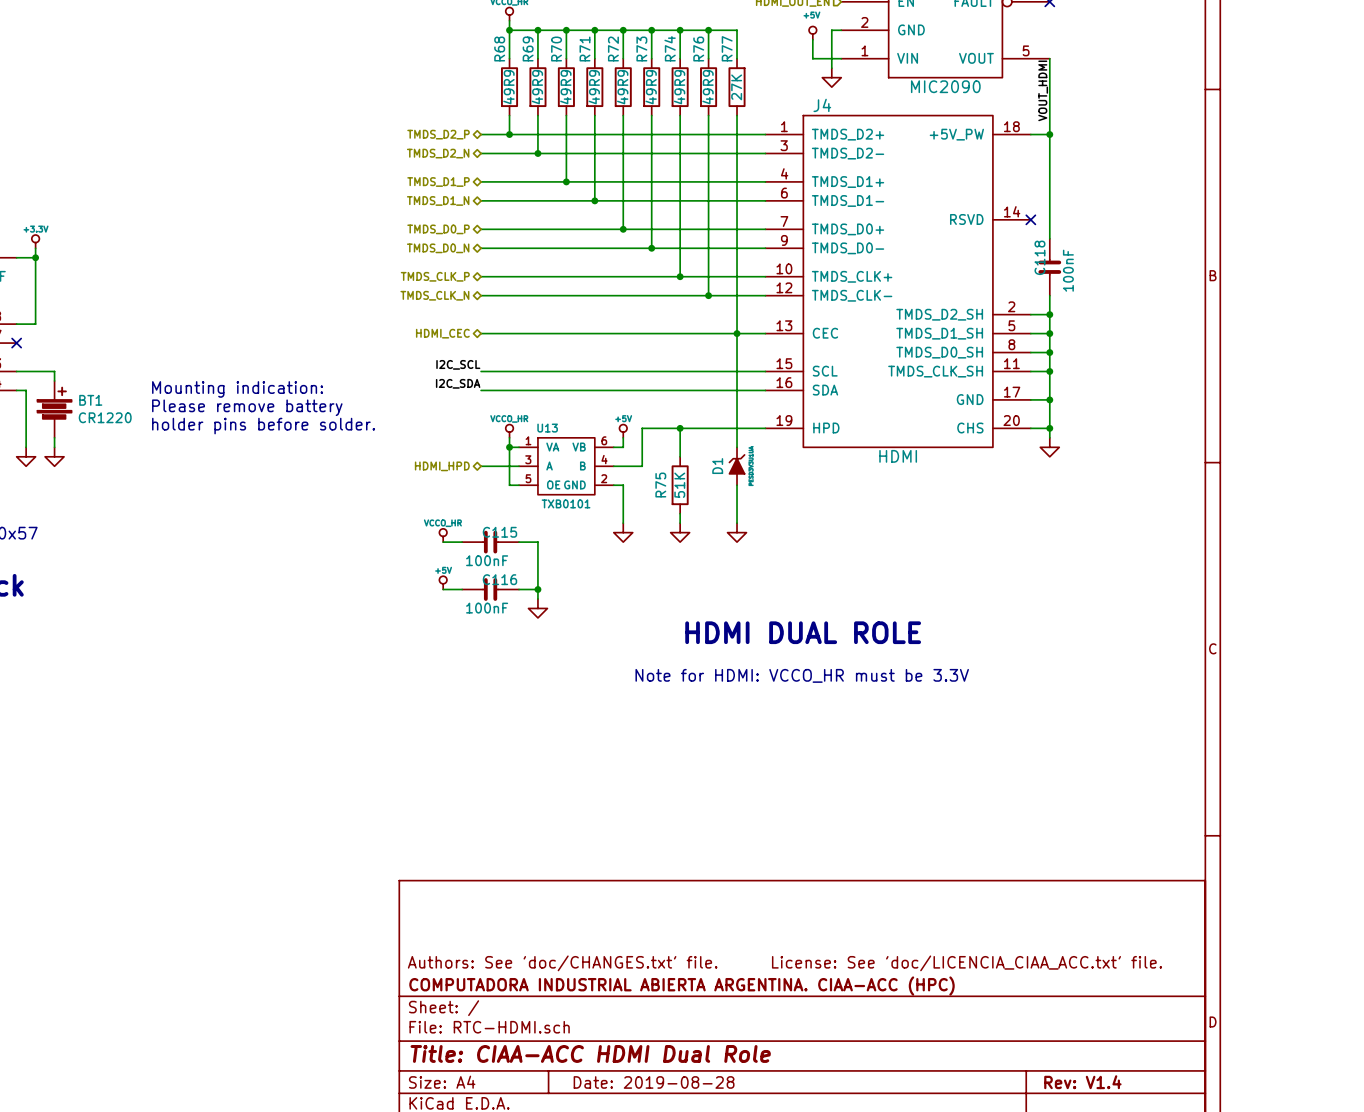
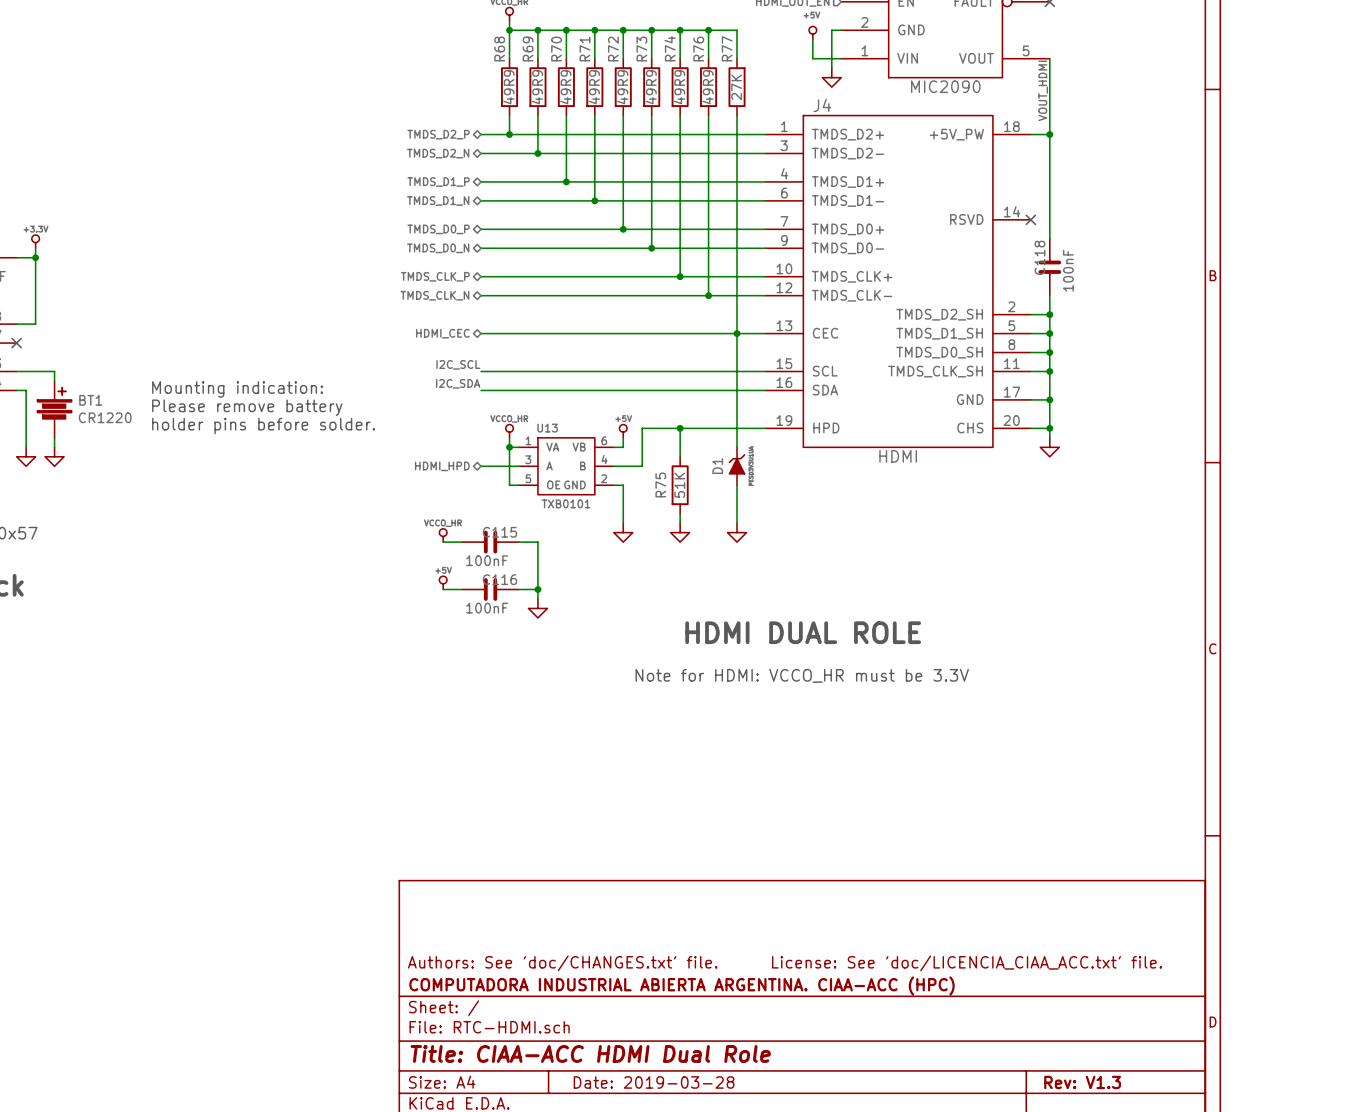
title block: Date: 2019-08-28 (654, 1082) -> Date: 2019-03-28 (654, 1082)
title block: Rev: V1.4 (1082, 1082) -> Rev: V1.3 (1082, 1082)

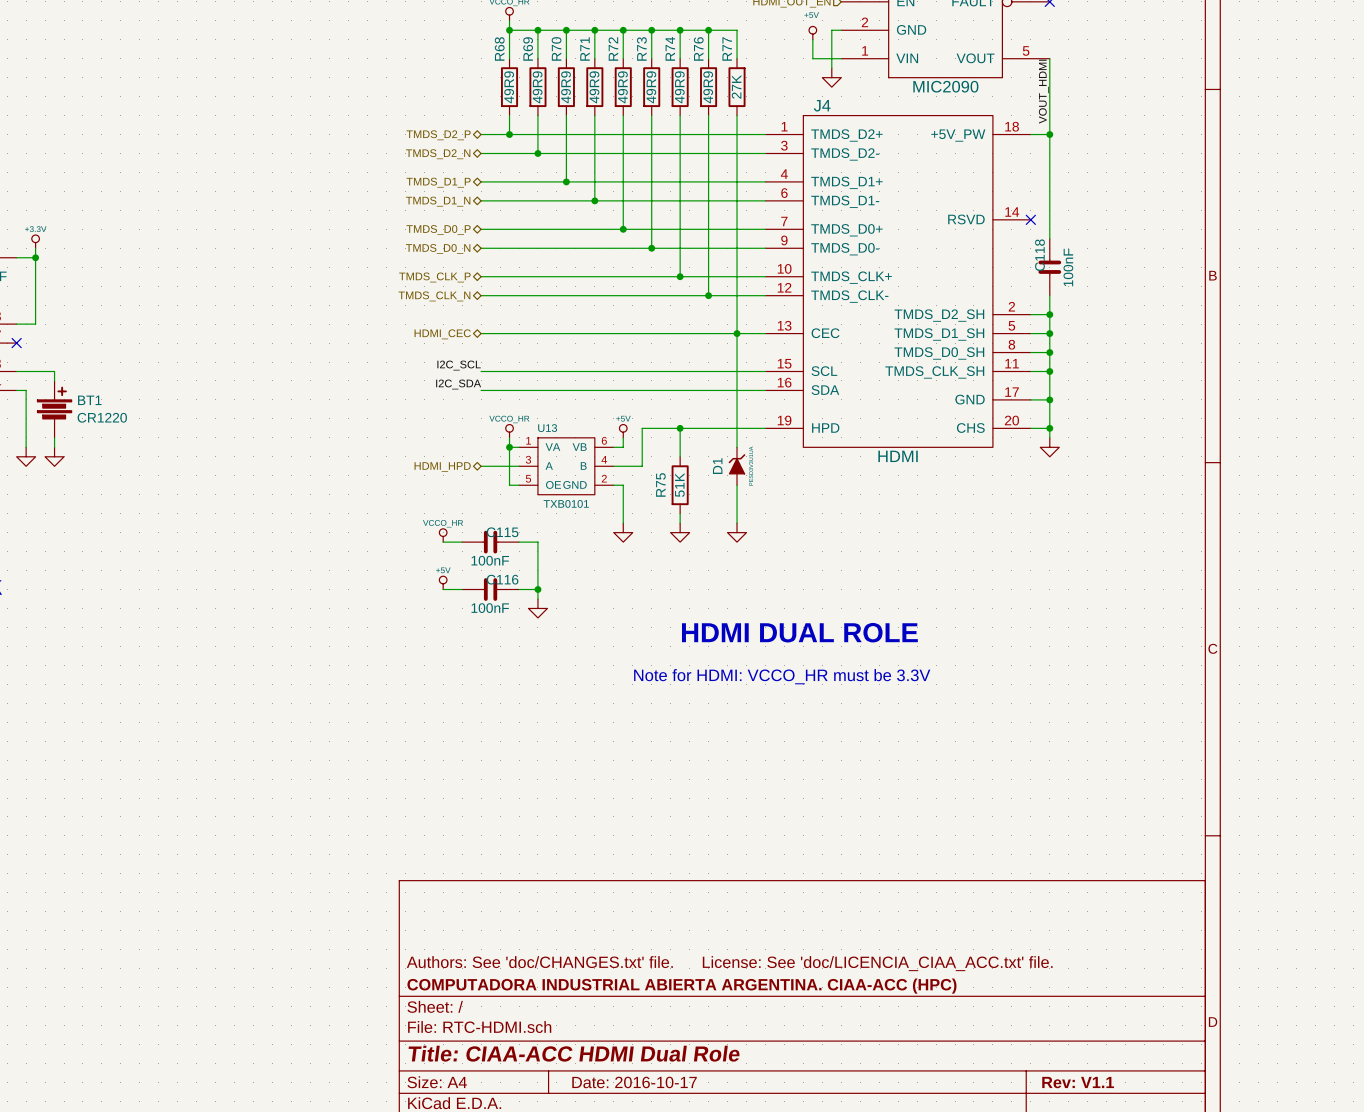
text: Mounting indication: (237, 389) -> none
text: Please remove battery (247, 407) -> none
text: holder pins before solder. (263, 426) -> none
title block: Date: 2019-03-28 (654, 1082) -> Date: 2016-10-17 (634, 1082)
title block: Rev: V1.3 (1082, 1082) -> Rev: V1.1 (1078, 1082)

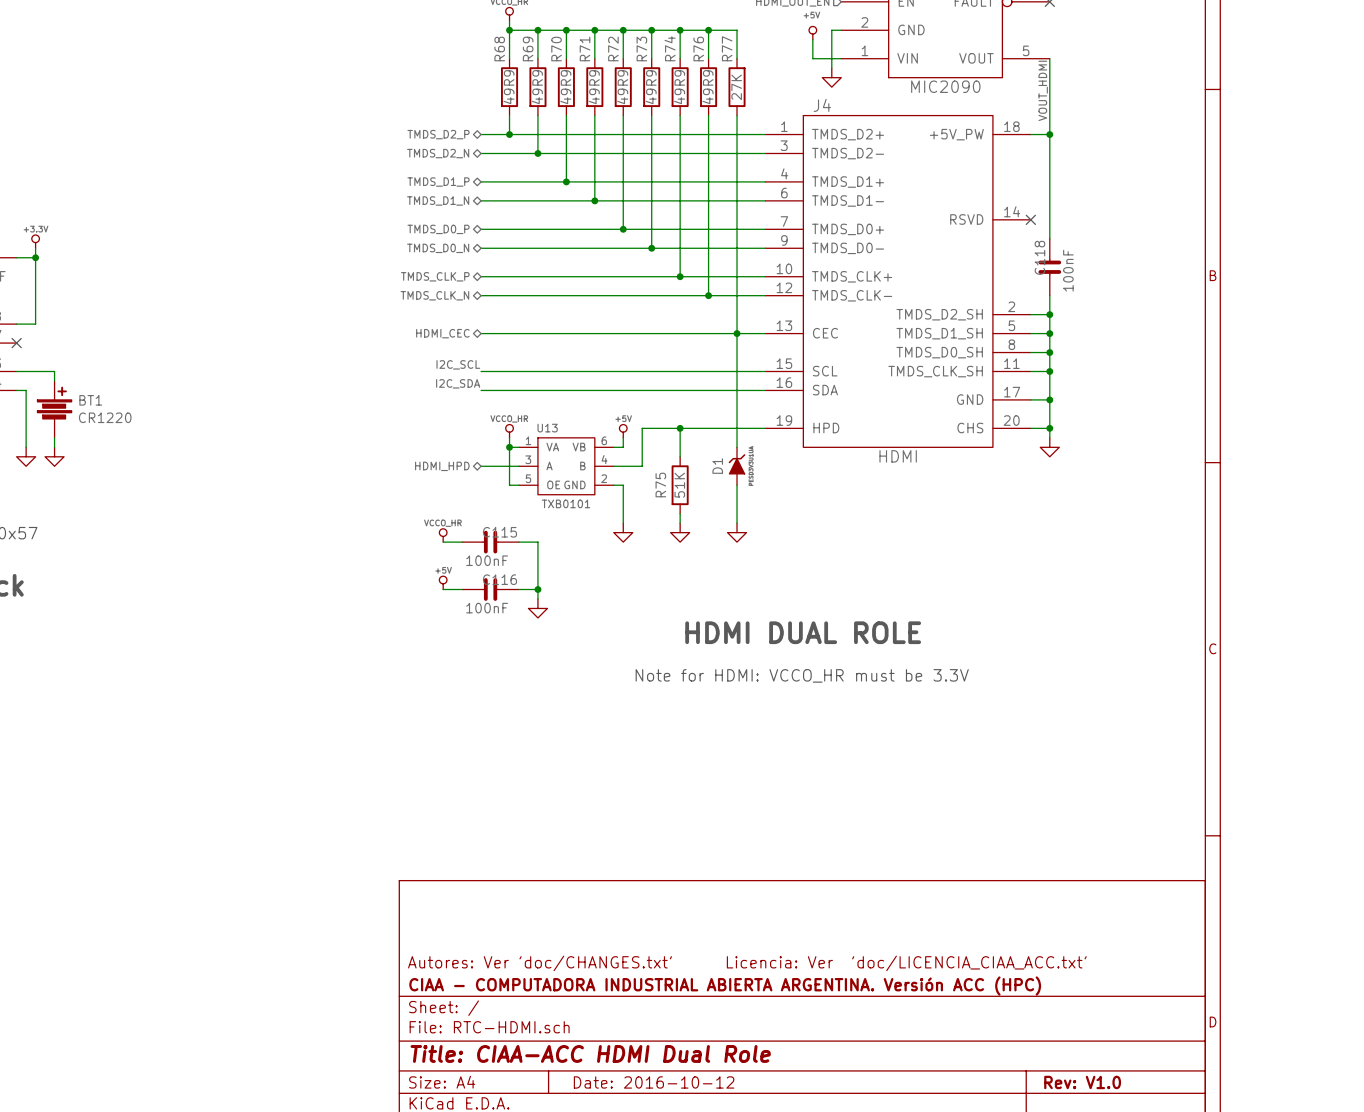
title block: Authors: See 'doc/CHANGES.txt' file. License: See 'doc/LICENCIA_CIAA_ACC.txt' file. (729, 963) -> Autores: Ver 'doc/CHANGES.txt' Licencia: Ver 'doc/LICENCIA_CIAA_ACC.txt' (747, 963)
title block: COMPUTADORA INDUSTRIAL ABIERTA ARGENTINA. CIAA-ACC (HPC) (681, 986) -> CIAA - COMPUTADORA INDUSTRIAL ABIERTA ARGENTINA. Versión ACC (HPC) (725, 986)
title block: Date: 2016-10-17 (634, 1082) -> Date: 2016-10-12 (654, 1082)
title block: Rev: V1.1 (1078, 1082) -> Rev: V1.0 (1082, 1082)

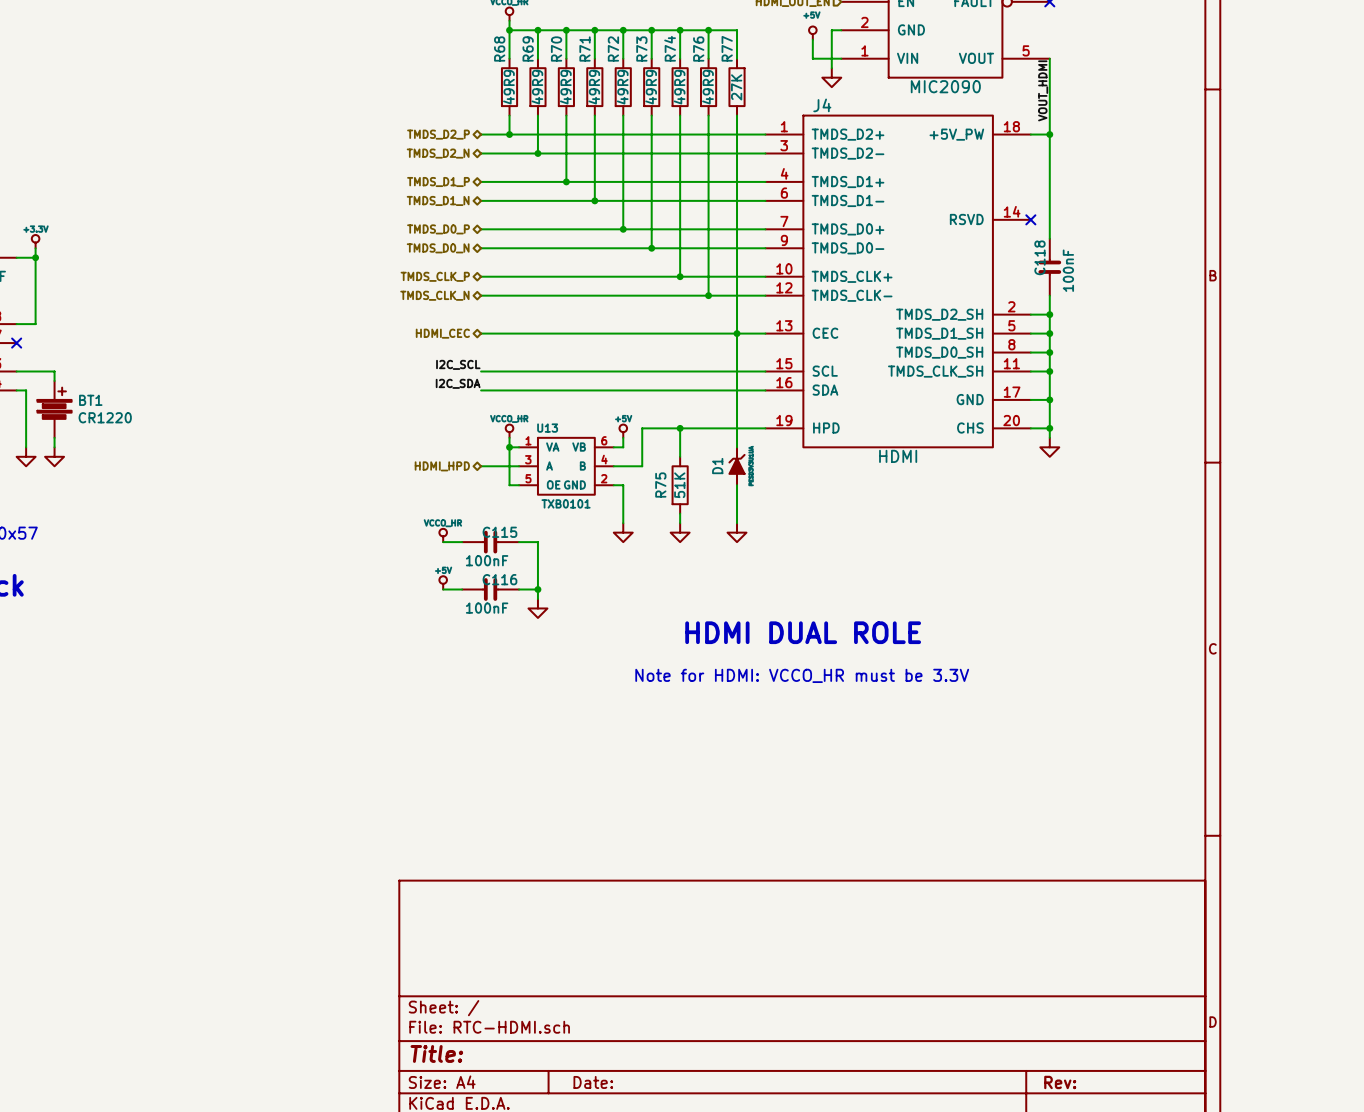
title block: Autores: Ver 'doc/CHANGES.txt' Licencia: Ver 'doc/LICENCIA_CIAA_ACC.txt' (747, 963) -> none
title block: CIAA - COMPUTADORA INDUSTRIAL ABIERTA ARGENTINA. Versión ACC (HPC) (725, 986) -> none
title block: Title: CIAA-ACC HDMI Dual Role (590, 1053) -> Title: (436, 1053)
title block: Date: 2016-10-12 (654, 1082) -> Date: (593, 1082)
title block: Rev: V1.0 (1082, 1082) -> Rev: (1060, 1082)

